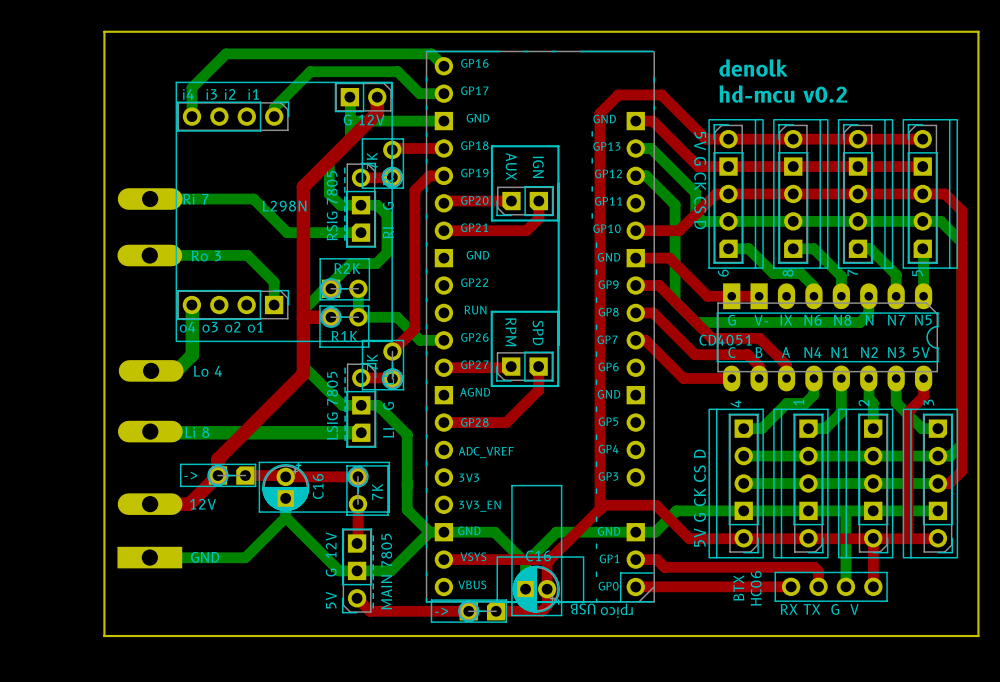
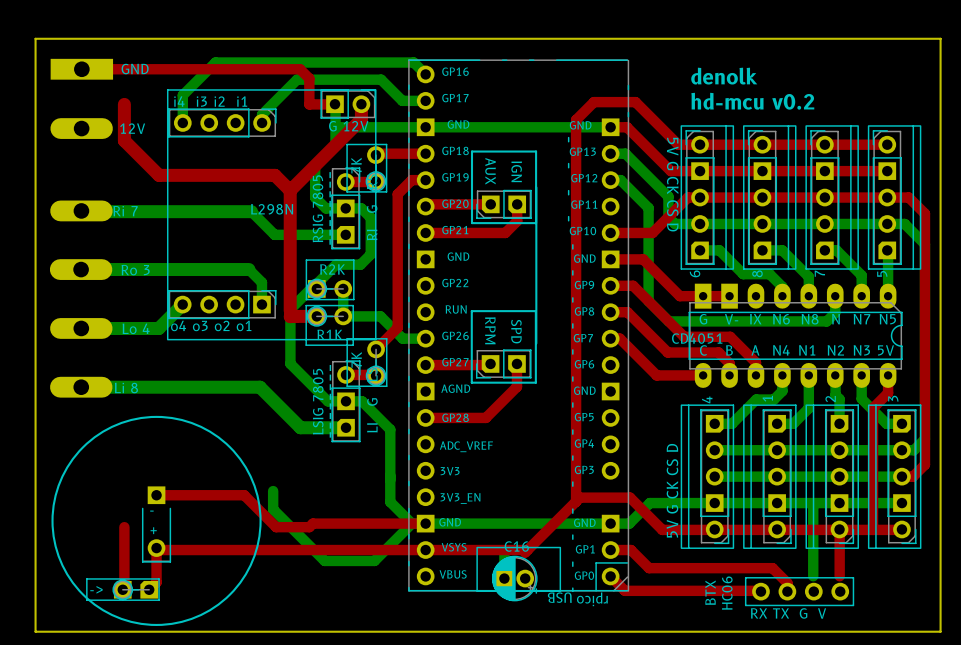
board edge: (104, 31) (978, 31) (978, 636) (104, 636) (104, 31) -> (35, 38) (35, 631) (940, 631) (940, 38) (35, 38)
top track: none -> (81, 69) (300, 69) (309, 78) (309, 104) (333, 104)
part: none -> (81, 69)
text: none -> GND (135, 69)
top track: none -> (124, 104) (124, 140) (159, 175) (274, 175) (290, 190)
bottom track: none -> (425, 127) (610, 127)
part: none -> (81, 128)
text: none -> 12V (132, 128)
bottom track: (150, 199) (253, 199) (263, 208) -> (81, 210) (251, 211)
part: (150, 199) -> none
text position: Ri 7 (195, 199) -> Ri 7 (125, 211)
part: none -> (81, 210)
bottom track: (149, 255) (247, 255) (260, 268) -> (81, 269) (248, 269)
part: (149, 255) -> none
text position: Ro 3 (206, 256) -> Ro 3 (135, 270)
part: none -> (81, 269)
bottom track: (191, 305) (192, 355) (176, 370) (151, 370) -> (182, 304) (158, 328) (80, 327)
top track: (303, 311) (303, 373) (217, 459) (217, 475) (189, 504) (150, 504) -> none
part: none -> (81, 328)
part: (151, 370) -> none
text position: Lo 4 (207, 371) -> Lo 4 (136, 328)
part: none -> (81, 387)
part: (150, 431) -> none
bottom track: (151, 432) (314, 432) -> (81, 387) (259, 387) (300, 427)
text position: Li 8 (197, 432) -> Li 8 (126, 388)
line: (259, 462) (389, 462) (389, 512) (259, 512) (259, 462) -> none
line: (180, 464) (255, 464) (255, 486) (180, 486) (180, 464) -> (86, 578) (159, 578) (159, 600) (86, 600) (86, 578)
line: (346, 465) (387, 465) (387, 515) (346, 515) (346, 465) -> none
part position: (230, 475) -> (135, 589)
top track: (245, 475) (357, 476) -> none
line: (511, 485) (561, 485) (561, 615) (511, 615) (511, 485) -> none
part: C16 (285, 486) -> none
7K: (357, 489) -> none
top track: none -> (156, 495) (244, 495) (276, 527) (309, 527) (312, 523) (425, 523)
part: (150, 504) -> none
text: 12V (203, 504) -> none
top track: (357, 504) (357, 543) -> none
bottom track: (285, 517) (245, 557) (149, 557) -> none
part: none -> (156, 520)
bottom track: (494, 532) (525, 563) (556, 532) -> (474, 523) (534, 523)
top track: none -> (124, 527) (124, 588) (122, 589)
part: (149, 557) -> none
text: GND (205, 557) -> none
top track: none -> (425, 550) (158, 550) (156, 548) (156, 582) (149, 589)
top track: (547, 562) (547, 606) (541, 611) (496, 611) -> none
top track: (664, 567) (814, 567) (818, 571) (818, 586) -> (638, 557) (649, 568) (772, 568) (787, 582) (787, 591)
MAIN 7805: (357, 570) -> none
top track: (791, 586) (635, 587) -> (760, 591) (625, 590) (610, 576)
part position: (831, 586) -> (799, 591)
text position: BTX (738, 588) -> BTX (710, 592)
text position: HC06 (756, 588) -> HC06 (727, 593)
top track: (357, 598) (370, 611) (468, 611) -> none
line: (431, 600) (506, 600) (506, 622) (431, 622) (431, 600) -> none
part: (481, 611) -> none

